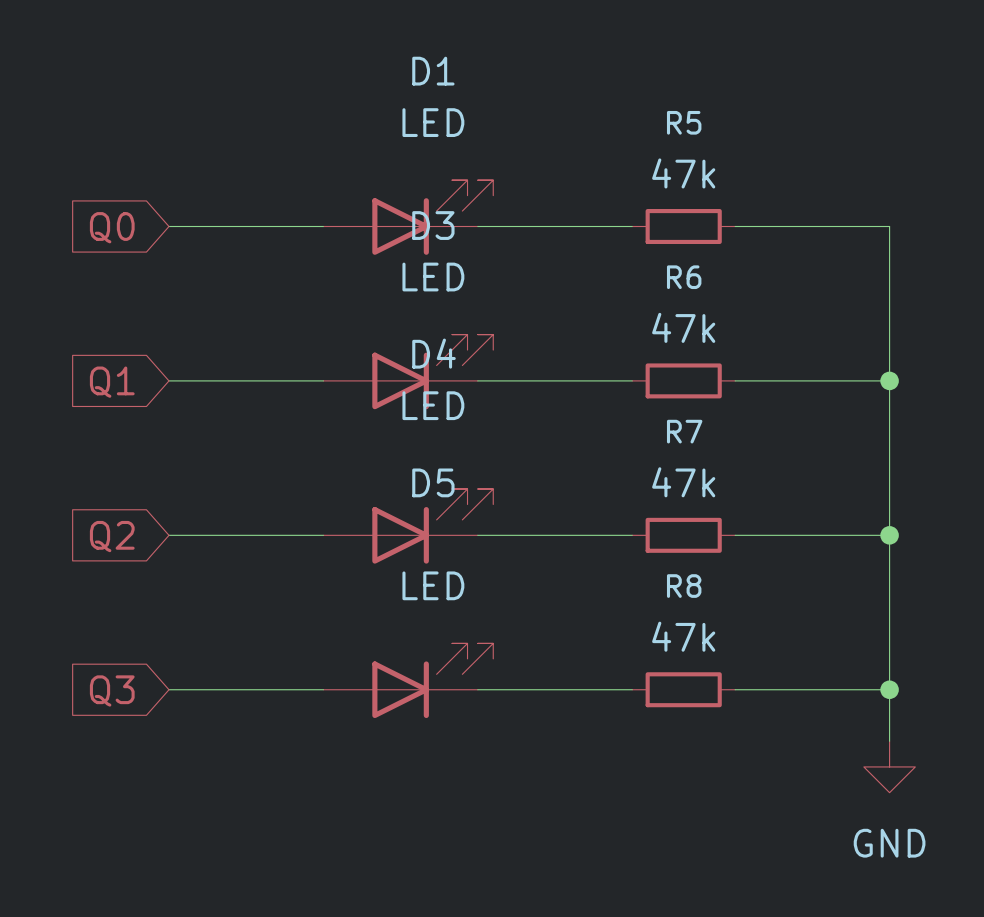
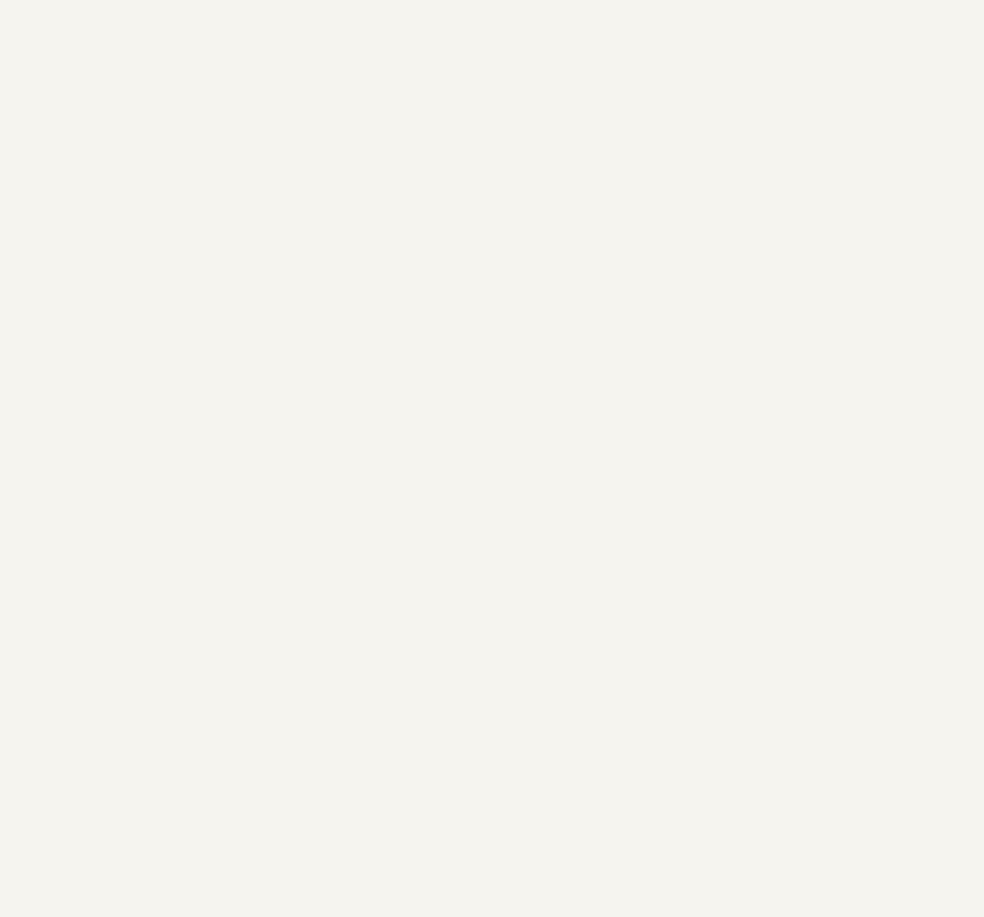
D1: LED (408, 217) -> none
wire: (168, 226) (323, 226) -> none
wire: (477, 226) (632, 226) -> none
R5: 47k (683, 226) -> none
wire: (735, 226) (889, 226) (889, 741) -> none
global label: Q0 (112, 227) -> none
D3: LED (408, 371) -> none
wire: (168, 380) (323, 380) -> none
wire: (477, 380) (632, 380) -> none
R6: 47k (683, 380) -> none
wire: (735, 380) (889, 380) -> none
junction: (889, 380) -> none
global label: Q1 (112, 382) -> none
D4: LED (408, 526) -> none
wire: (168, 535) (323, 535) -> none
wire: (477, 535) (632, 535) -> none
R7: 47k (683, 535) -> none
wire: (735, 535) (889, 535) -> none
junction: (889, 535) -> none
global label: Q2 (112, 536) -> none
D5: LED (408, 680) -> none
wire: (168, 689) (323, 689) -> none
wire: (477, 689) (632, 689) -> none
R8: 47k (683, 689) -> none
wire: (735, 689) (889, 689) -> none
junction: (889, 689) -> none
global label: Q3 (112, 690) -> none
power symbol: GND (889, 766) -> none

